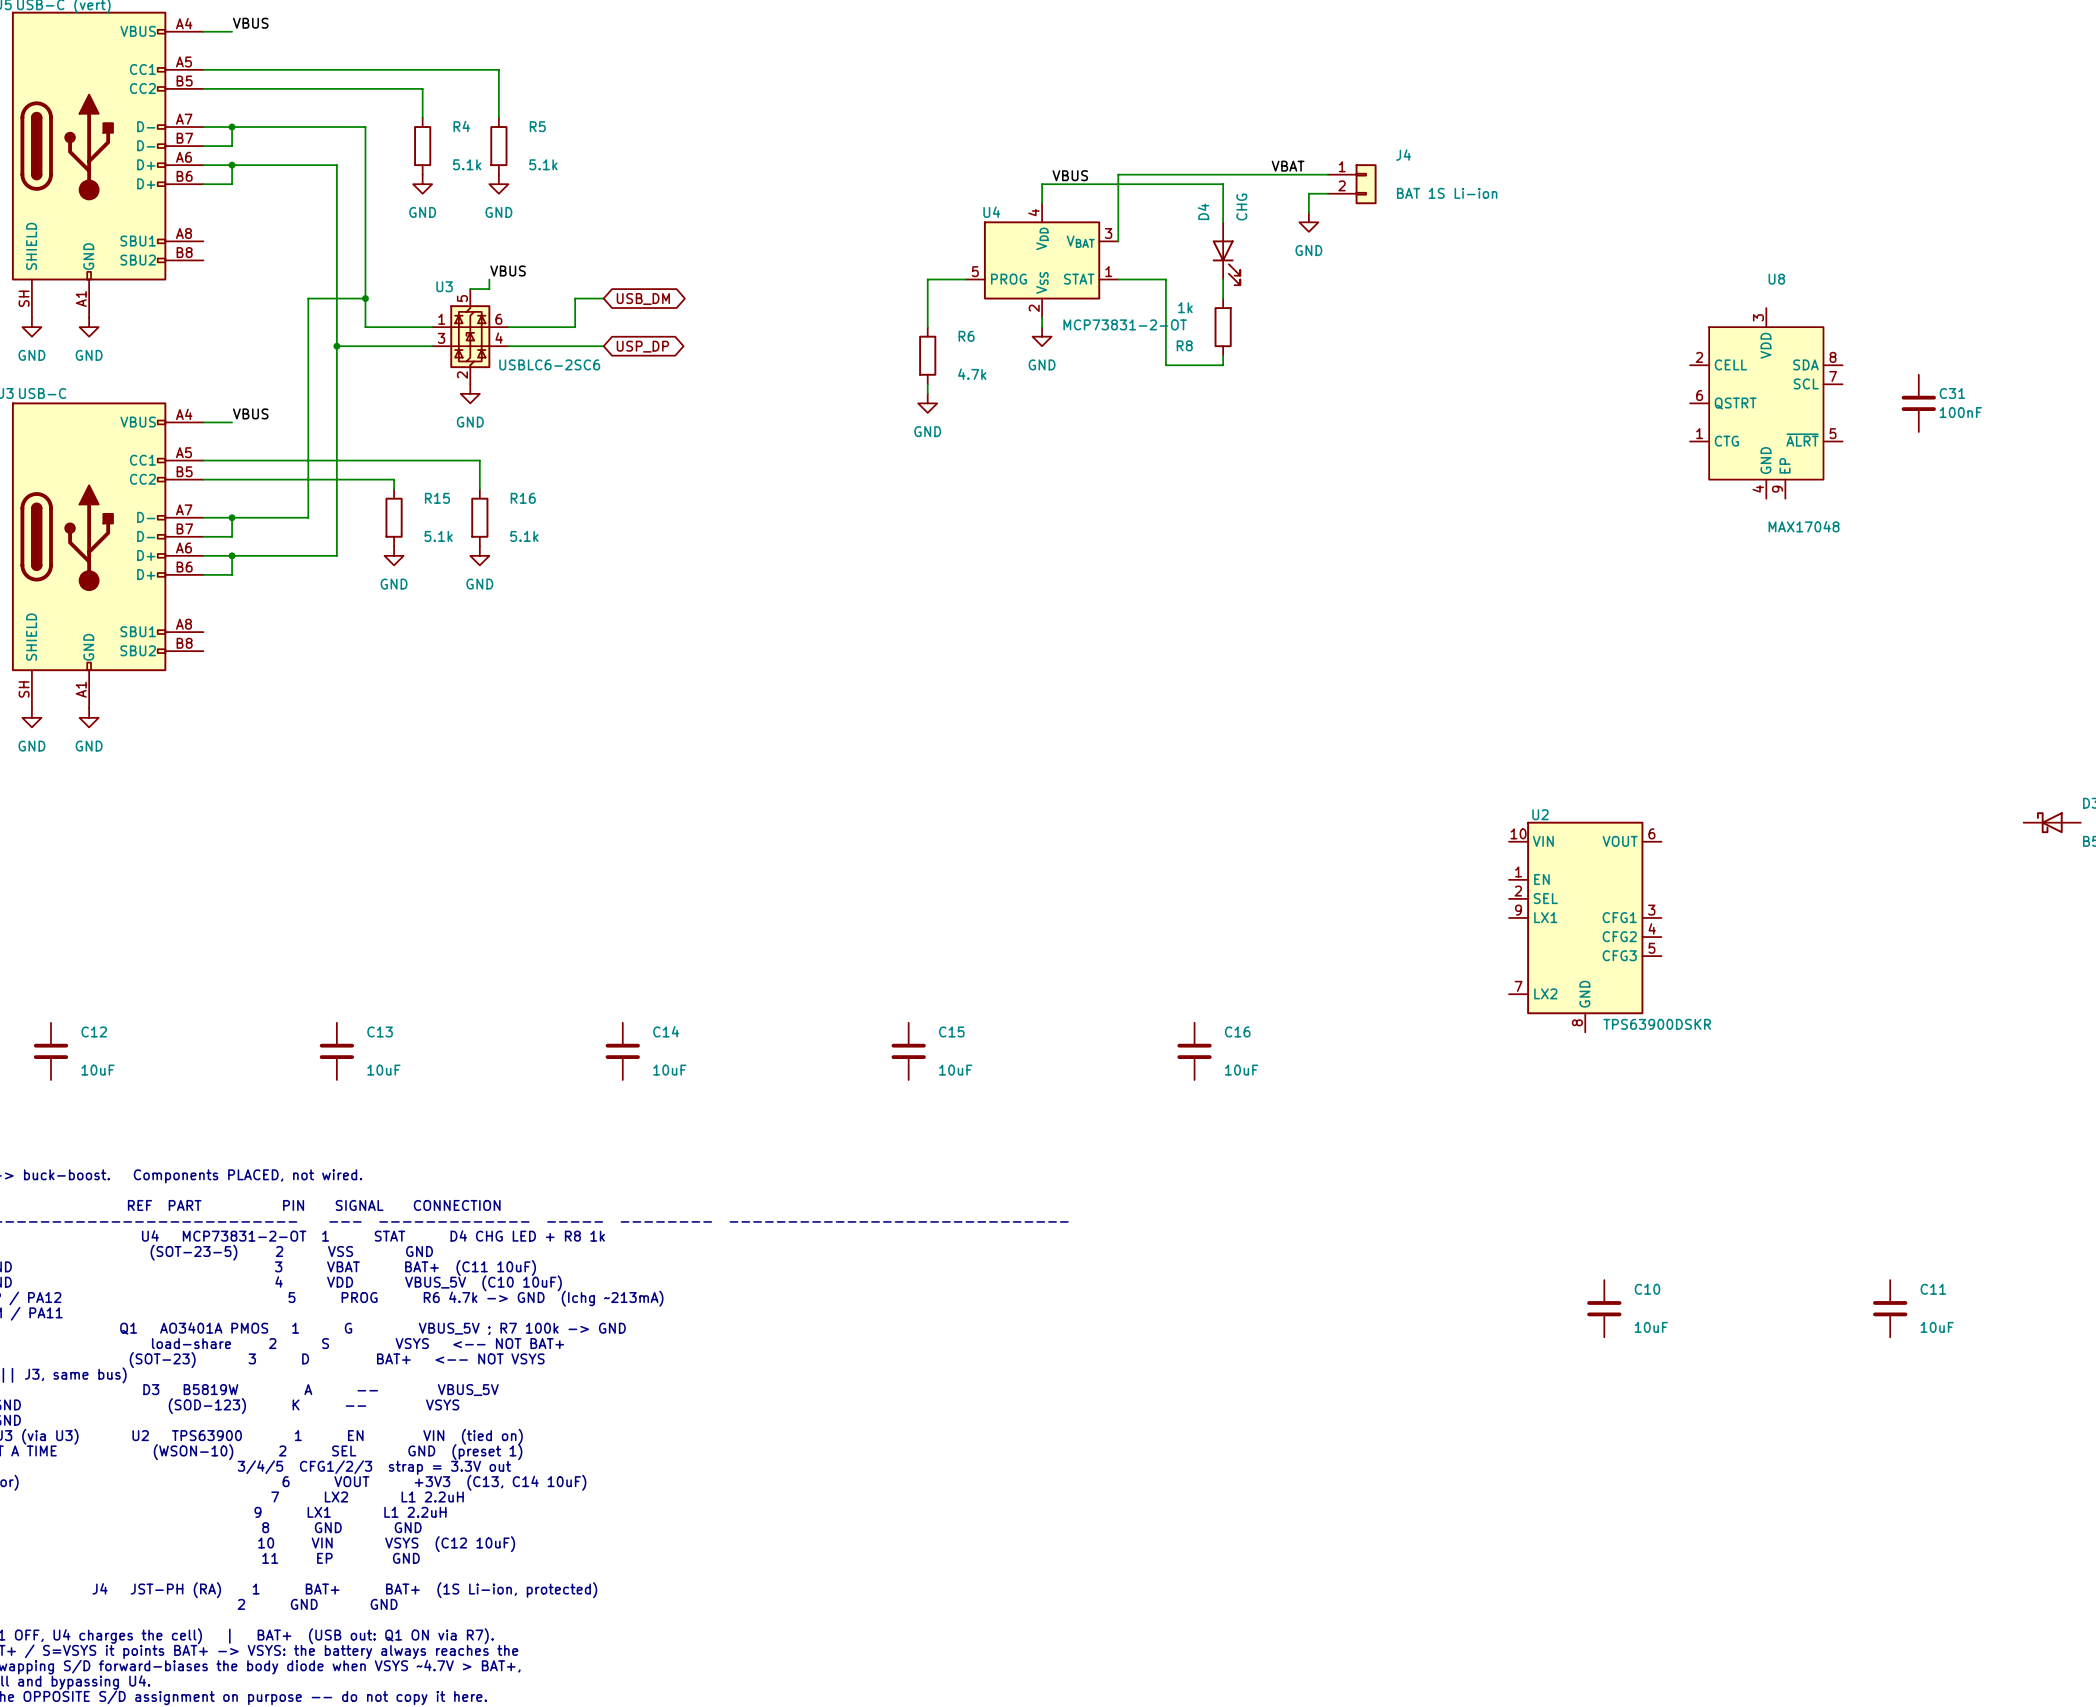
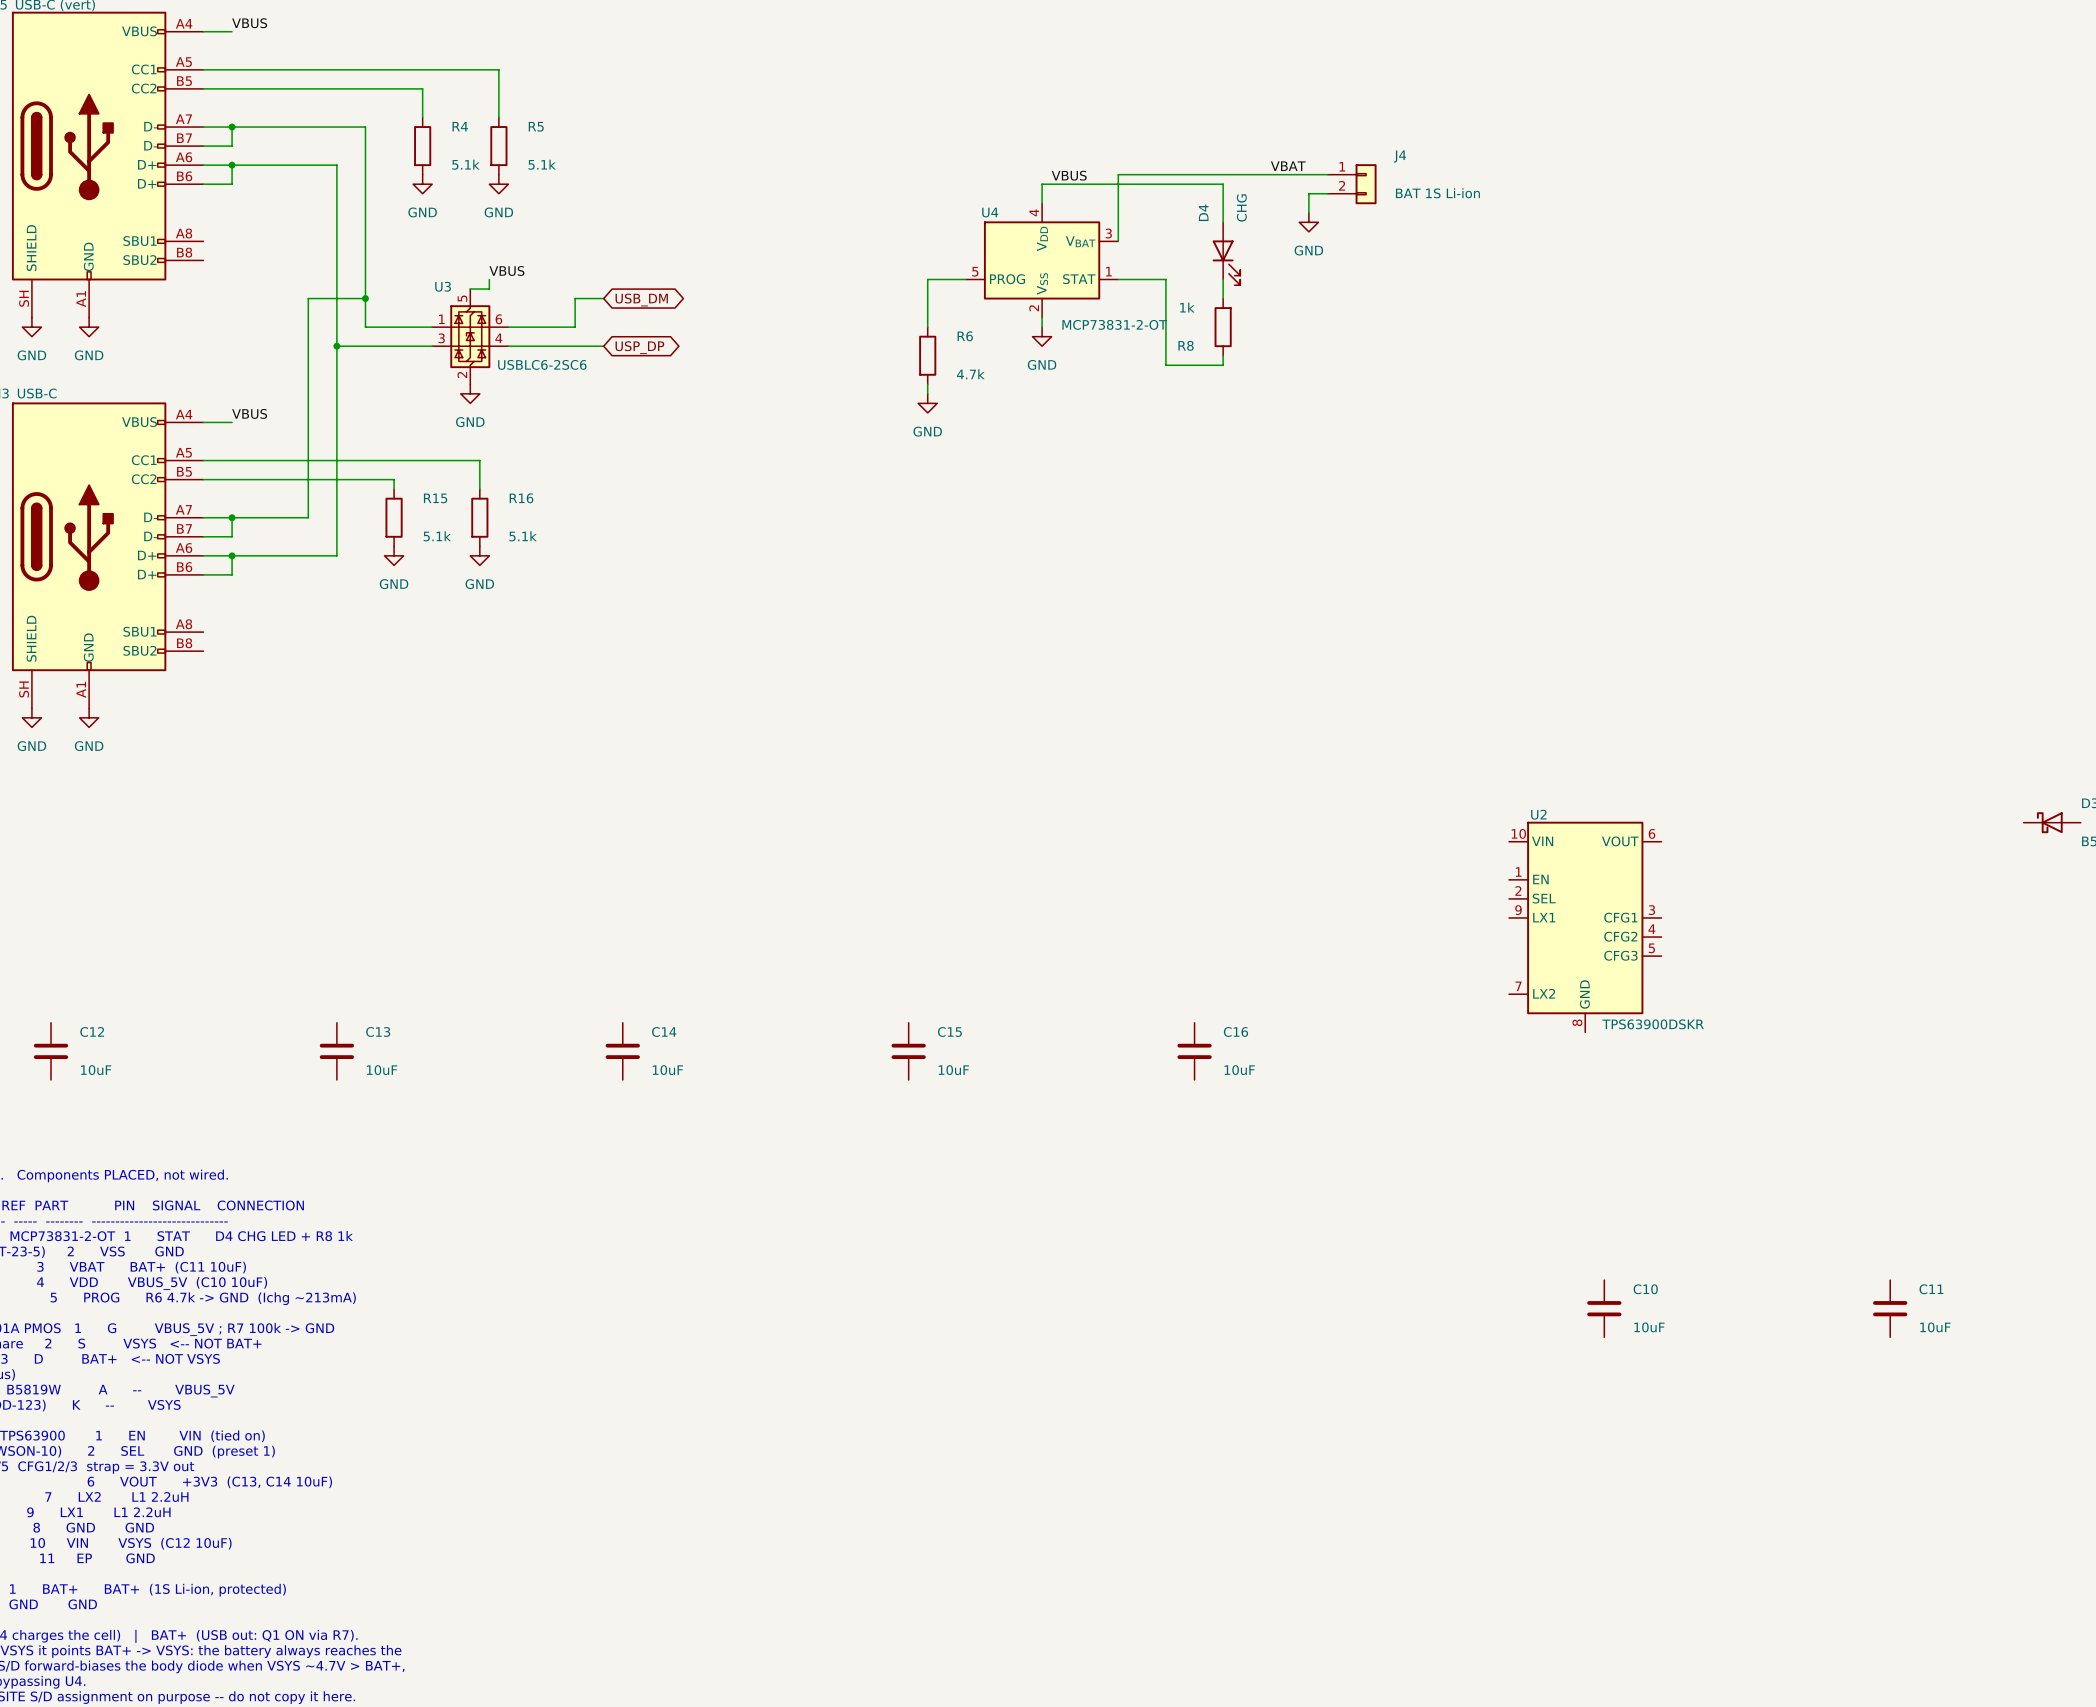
U8: MAX17048 (1766, 403) -> none
C31: 100nF (1918, 403) -> none

